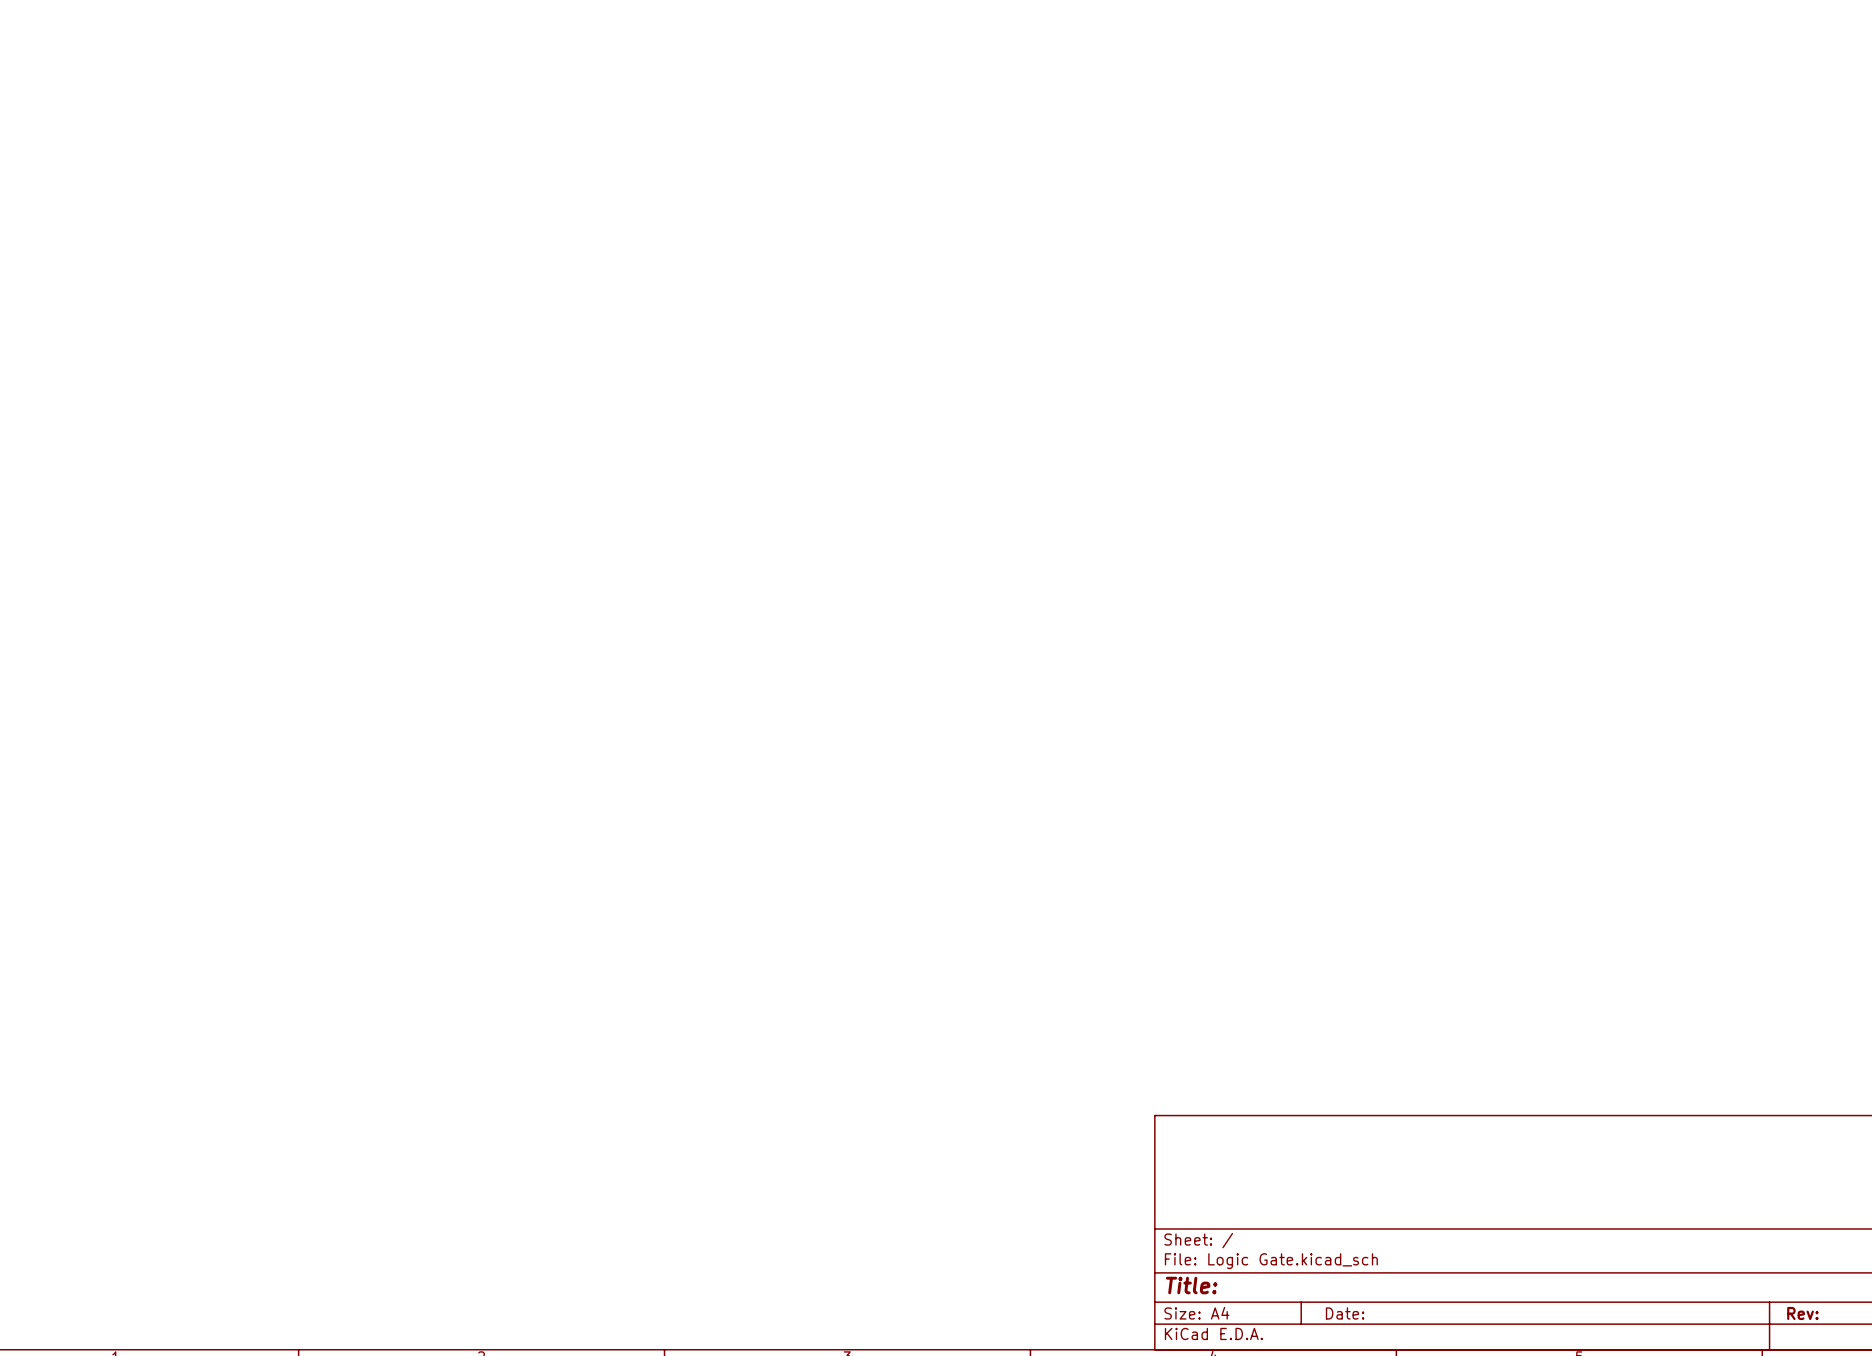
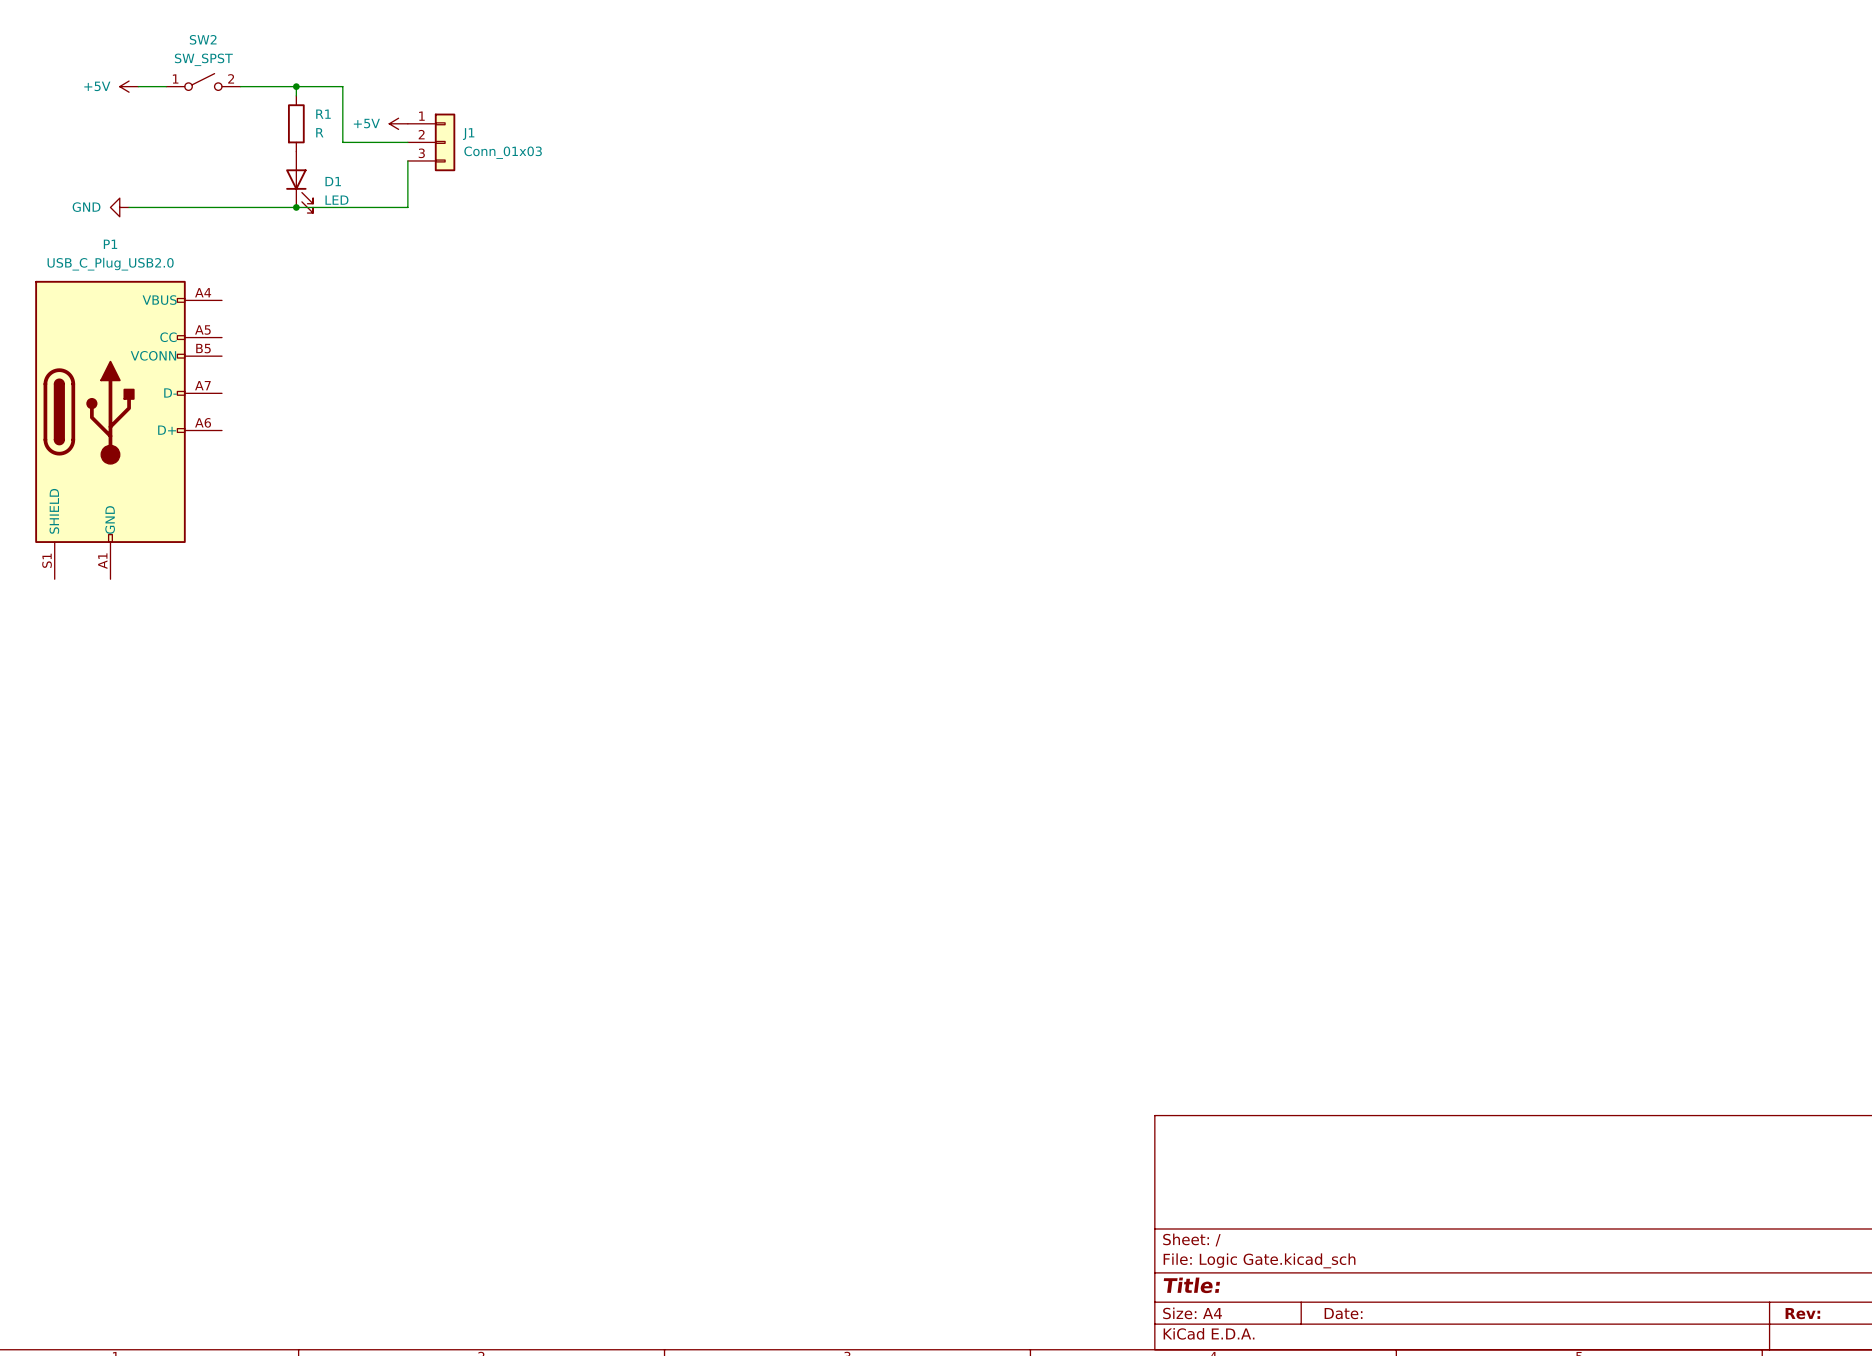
SW2: none -> SW_SPST (203, 81)
power symbol: none -> +5V (129, 86)
wire: none -> (138, 86) (166, 86)
wire: none -> (240, 86) (342, 86) (342, 142) (407, 142)
wire: none -> (296, 86) (296, 95)
junction: none -> (296, 86)
R1: none -> R (296, 123)
power symbol: none -> +5V (398, 123)
J1: none -> Conn_01x03 (431, 142)
wire: none -> (407, 160) (407, 207) (129, 207)
D1: none -> LED (299, 182)
power symbol: none -> GND (119, 207)
junction: none -> (296, 207)
P1: none -> USB_C_Plug_USB2.0 (128, 430)

